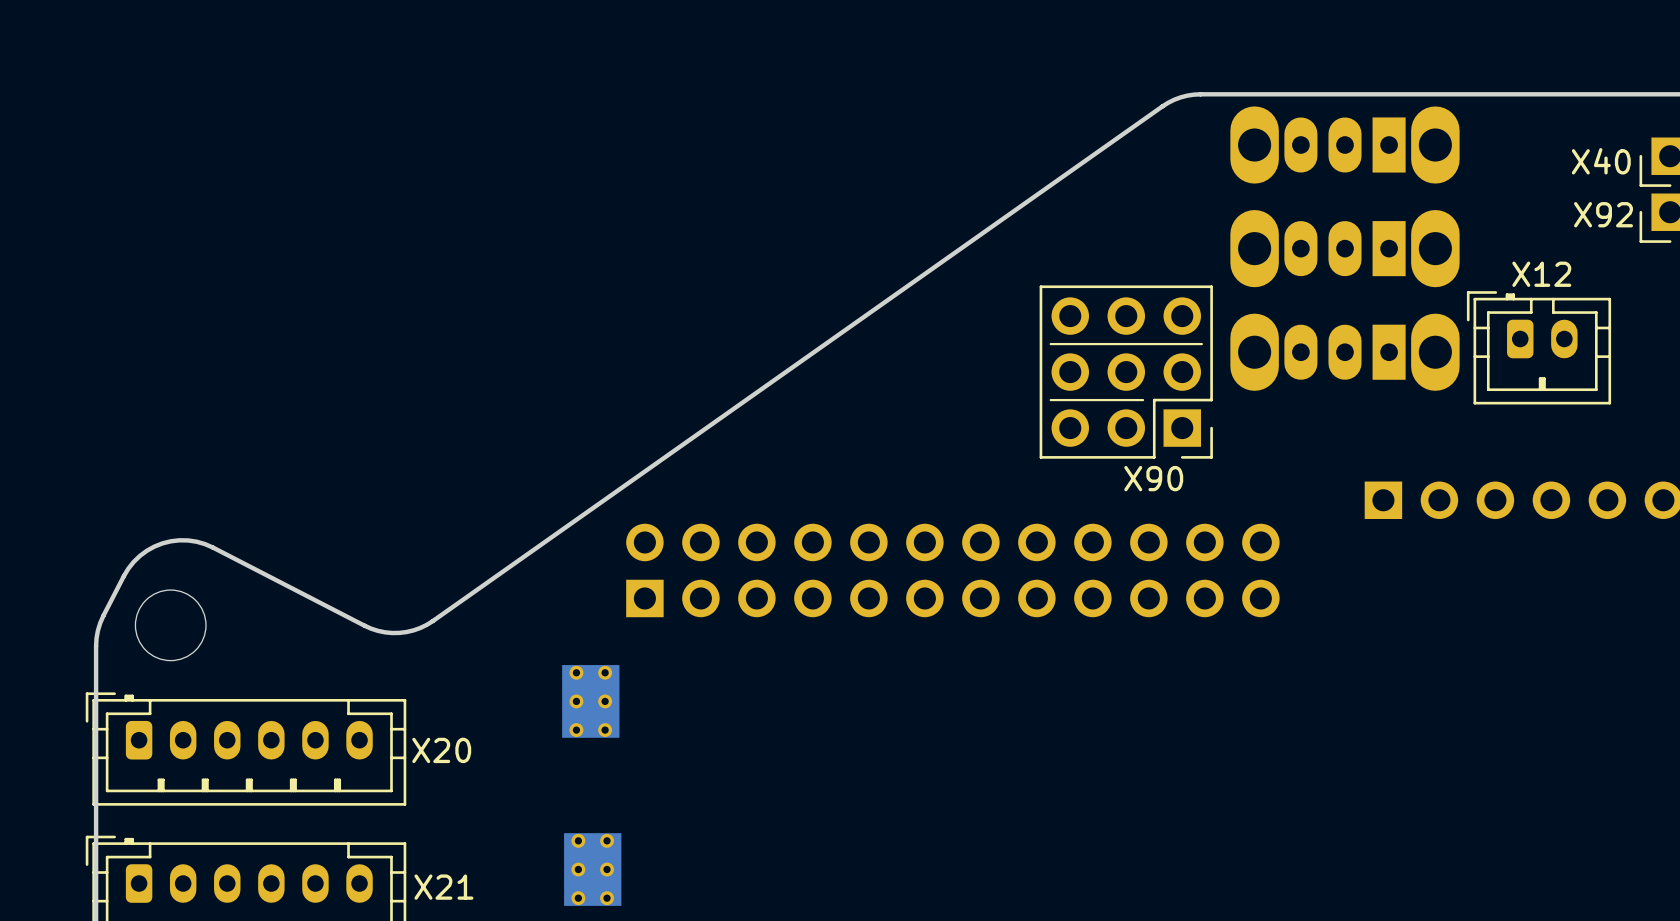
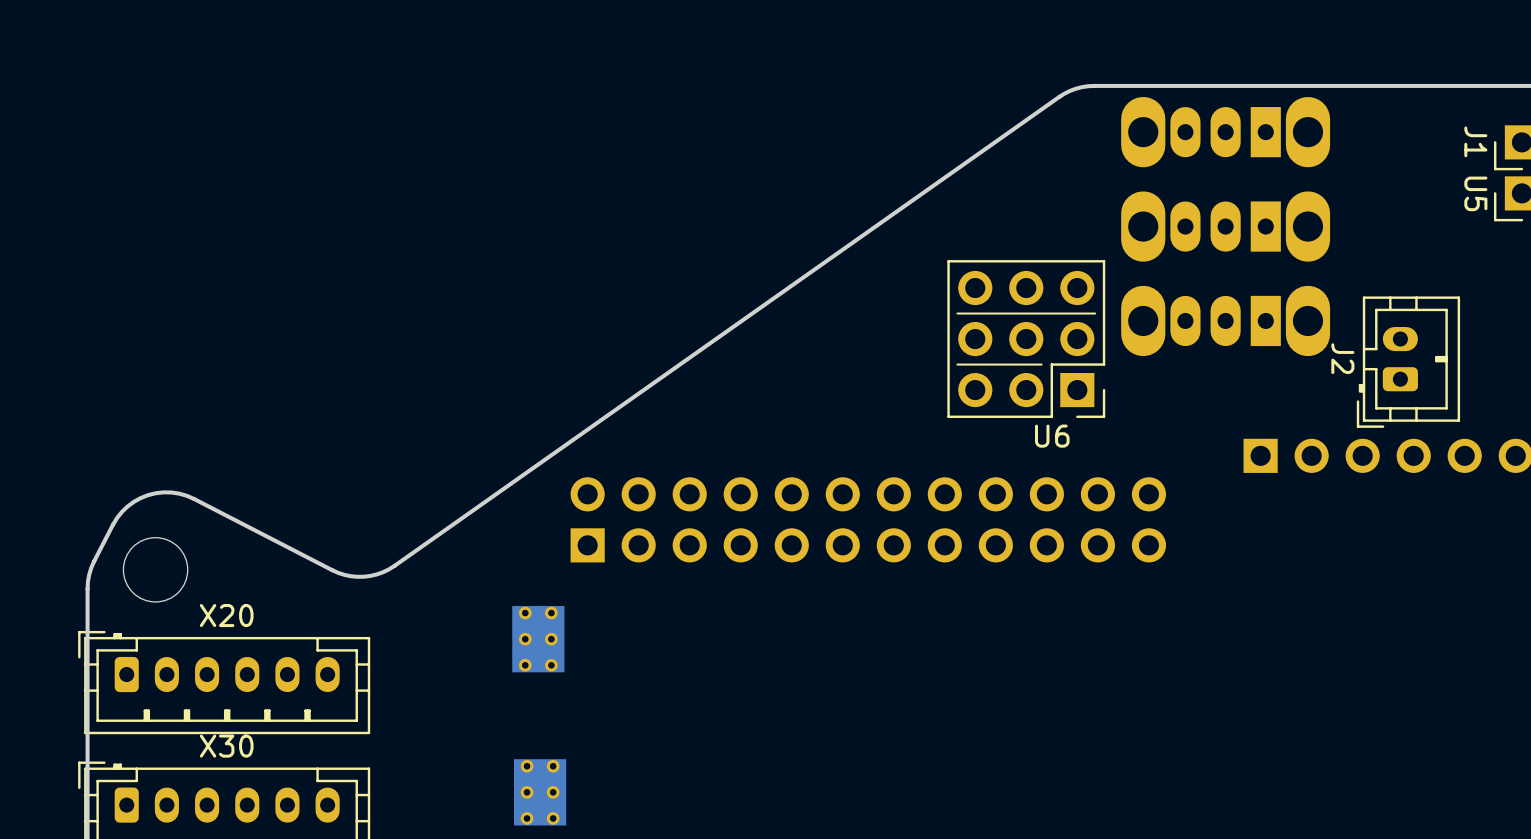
X40 name: X40 (1601, 161) -> J1 (1475, 141)
X92 name: X92 (1603, 214) -> U5 (1475, 193)
X12: (1539, 347) -> none
J2: none -> (1408, 362)
X90 name: X90 (1153, 478) -> U6 (1052, 436)
X20 name position: X20 (441, 750) -> X20 (226, 615)
X21 name: X21 (443, 887) -> X30 (226, 746)

